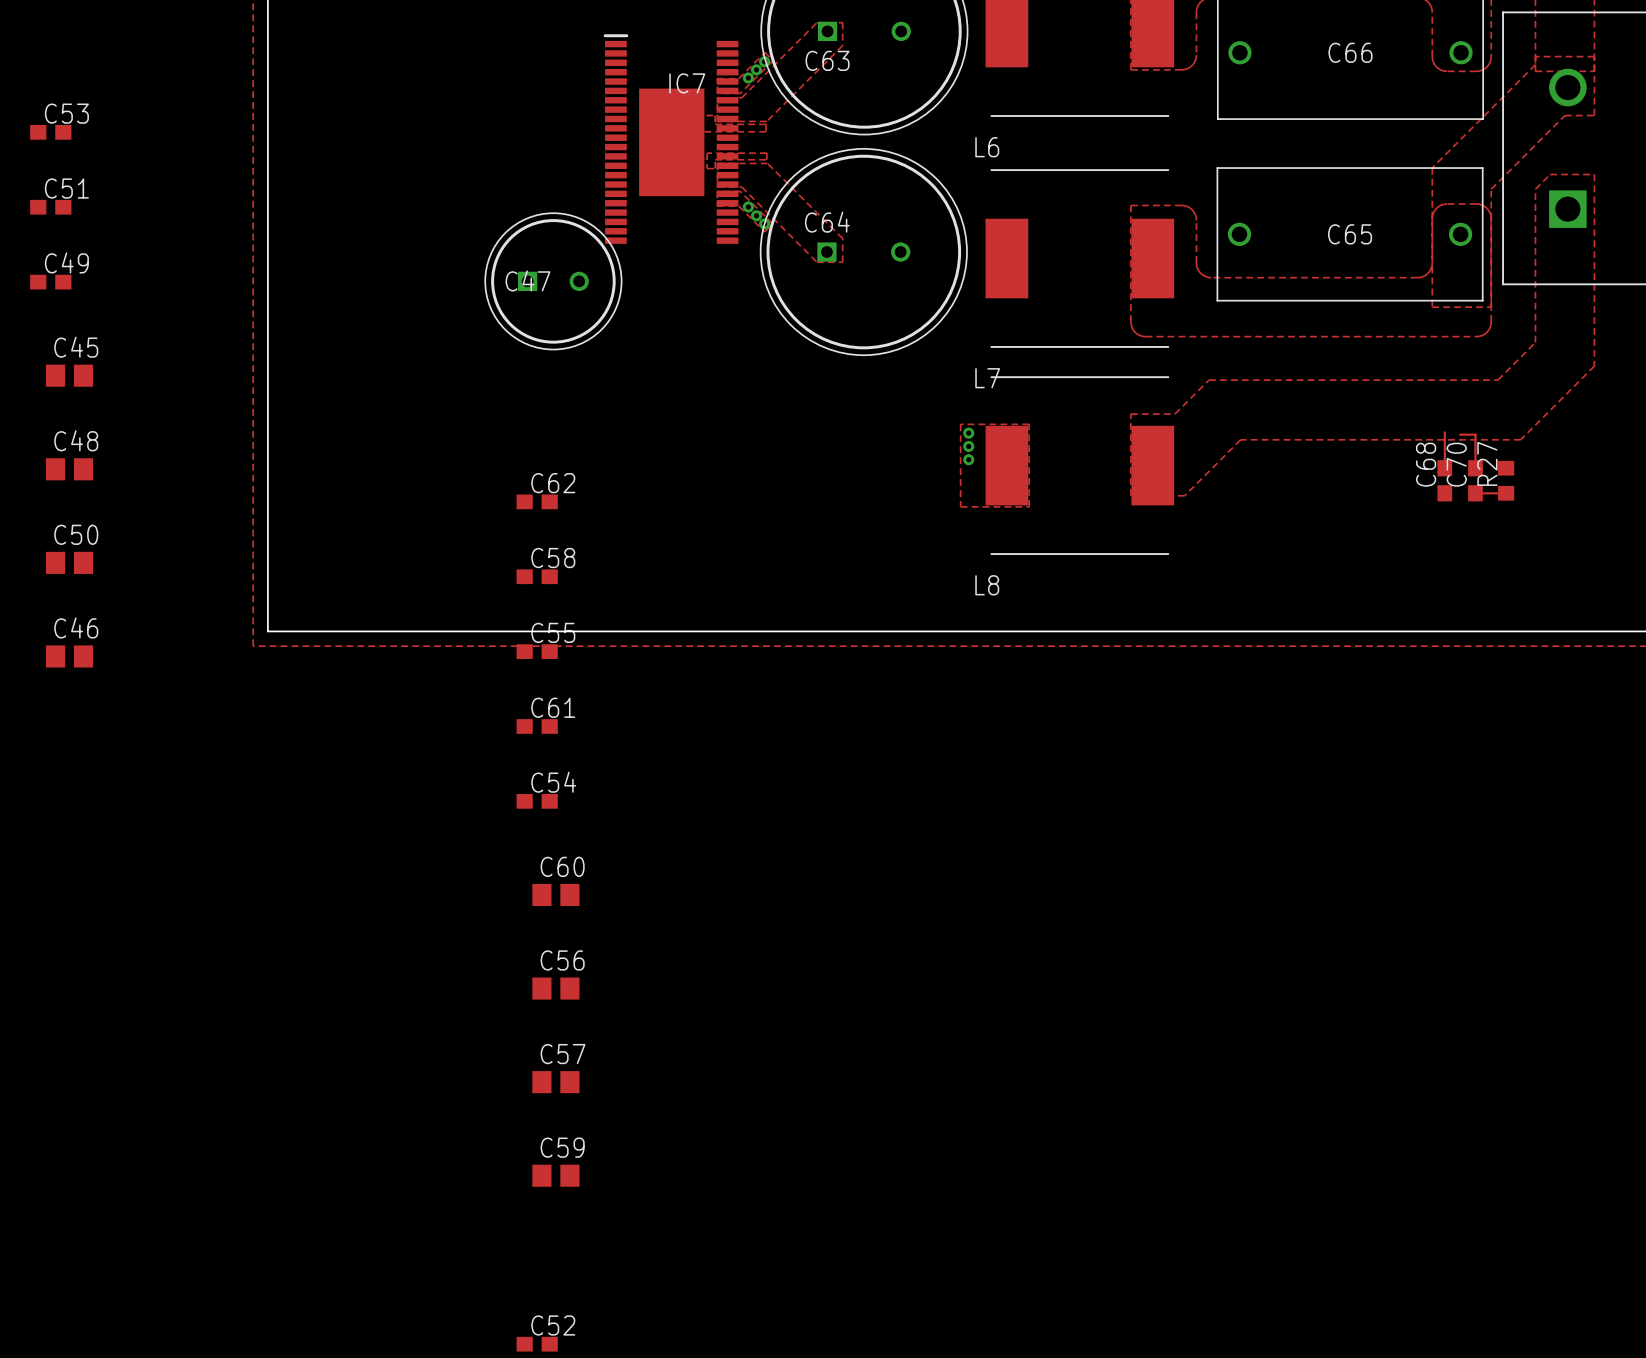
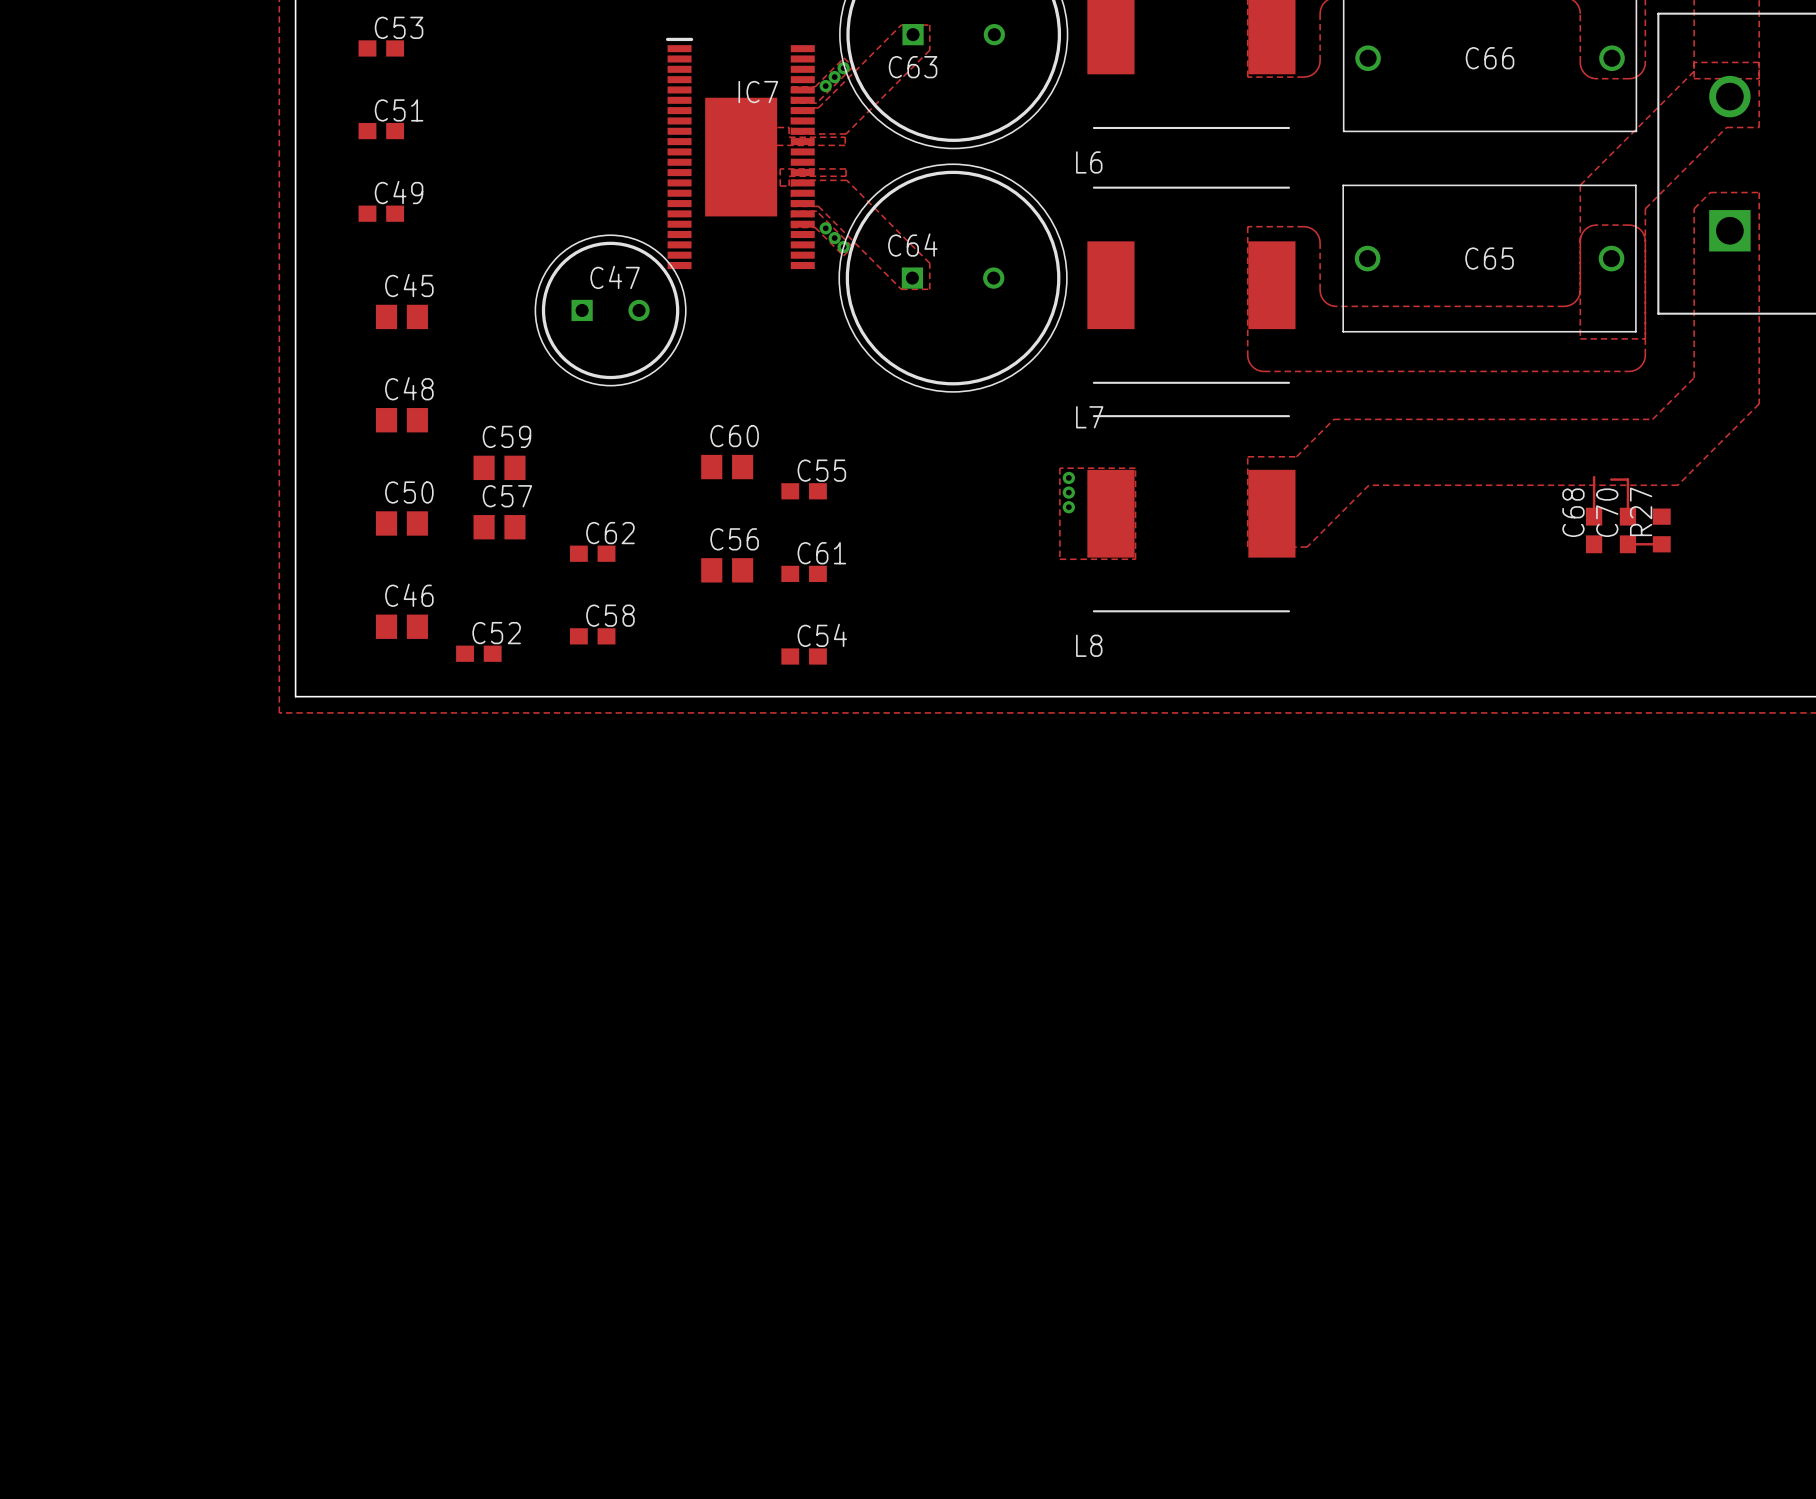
C53 position: (50, 132) -> (381, 48)
C51 position: (50, 207) -> (381, 131)
C47 name position: C47 (528, 280) -> C47 (615, 277)
C49 position: (50, 282) -> (381, 213)
C45 position: (69, 375) -> (401, 316)
C48 position: (69, 469) -> (401, 420)
C50 position: (69, 562) -> (401, 523)
C55 position: (537, 651) -> (804, 491)
C46 position: (69, 656) -> (401, 626)
C61 position: (537, 726) -> (804, 573)
C54 position: (537, 801) -> (804, 656)
C60 position: (555, 894) -> (727, 467)
C56 position: (555, 988) -> (727, 570)
C57 position: (555, 1082) -> (499, 527)
C59 position: (555, 1175) -> (499, 467)
C52 position: (537, 1344) -> (478, 653)

